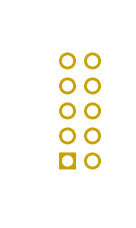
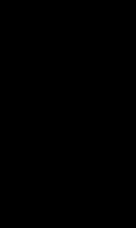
part: (80, 110) -> none

